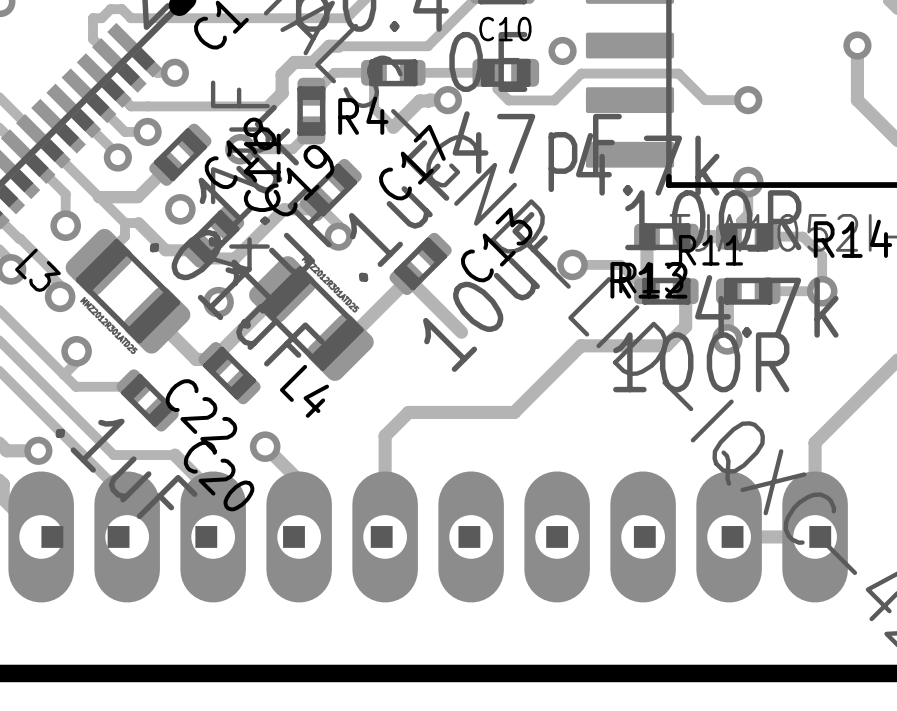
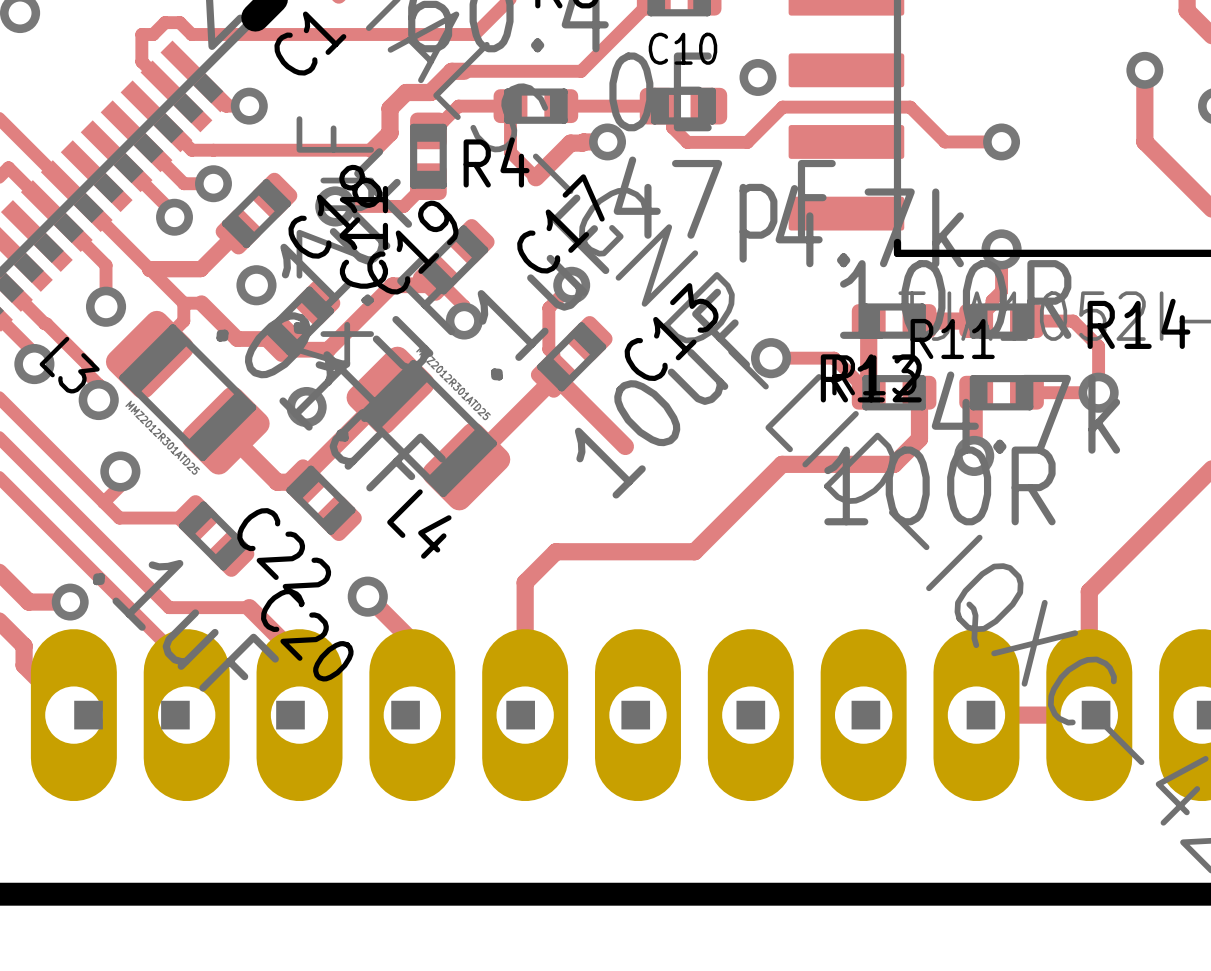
track: none -> (571, 285) (548, 308) (548, 349) (553, 354) (553, 374)
via: none -> (571, 285)

